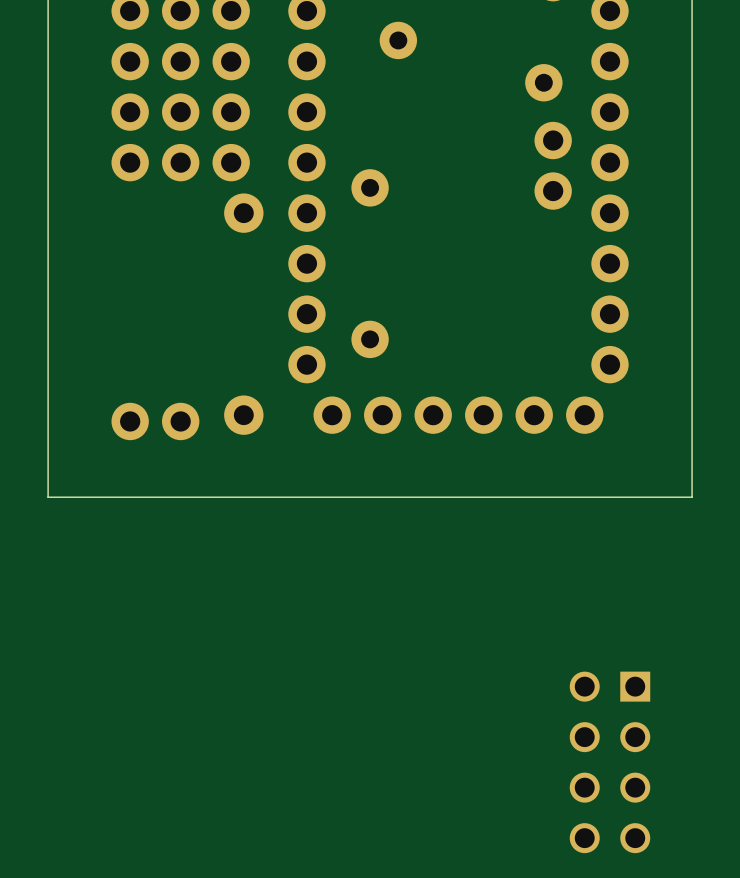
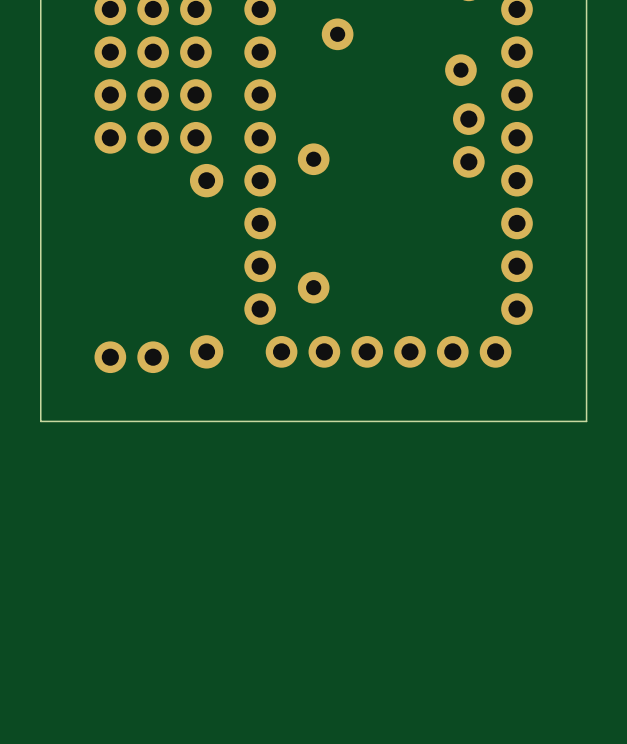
part: (609, 762) -> none

